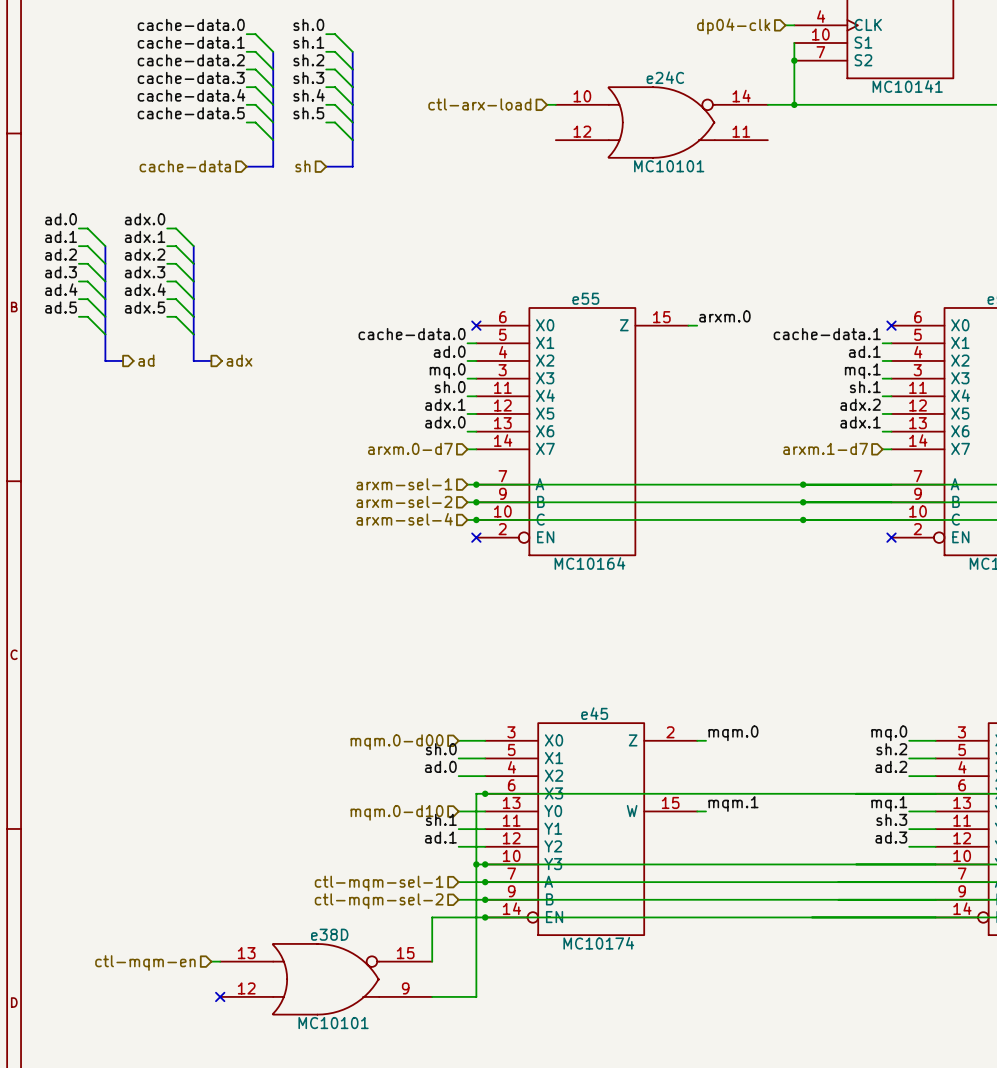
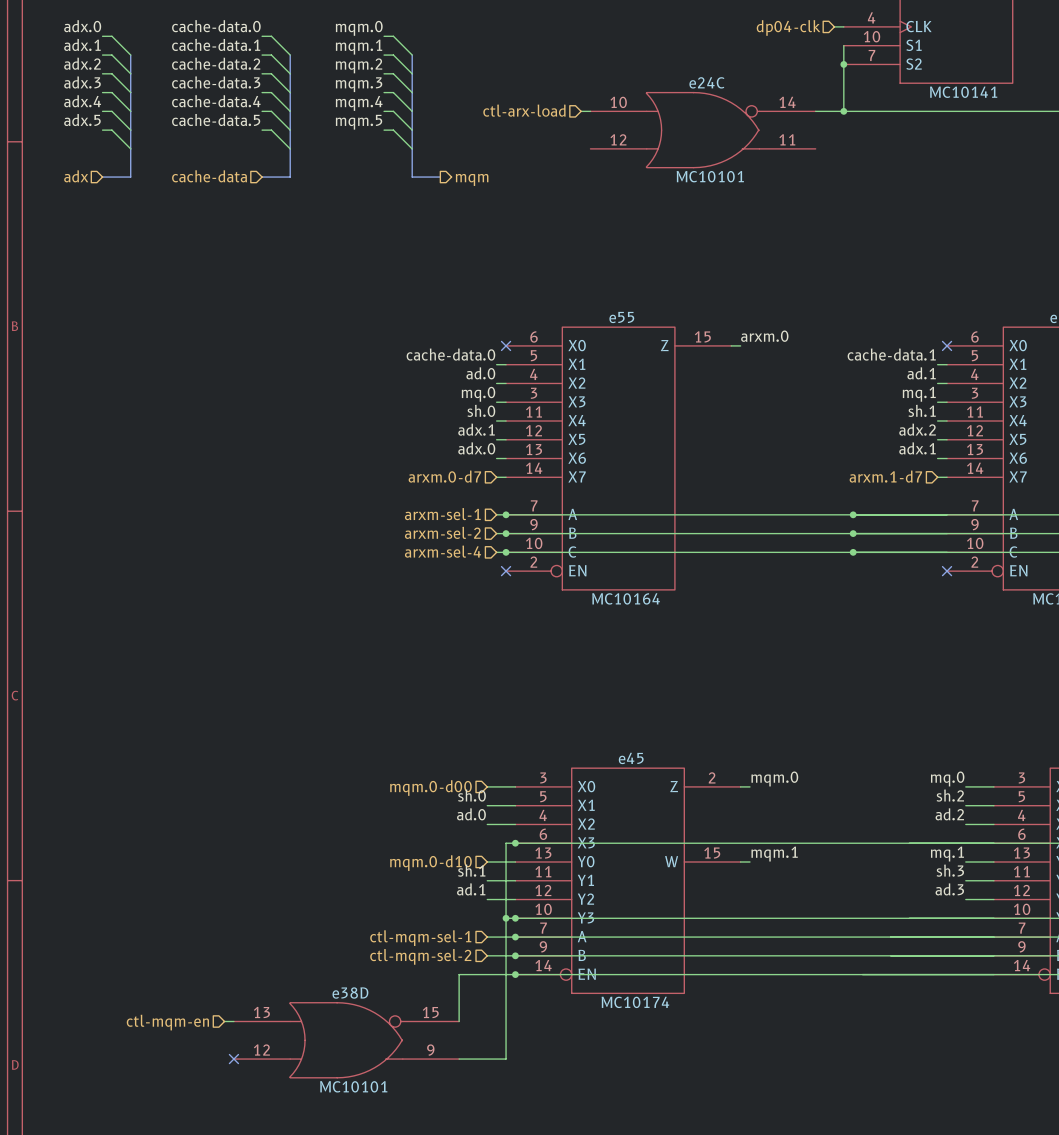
label: none -> adx.0 (82, 26)
label: sh.0 (308, 24) -> none
label: none -> mqm.0 (359, 28)
wire: none -> (102, 36) (111, 36) (130, 55)
wire: (326, 34) (335, 34) (352, 51) -> (384, 36) (393, 36) (412, 55)
label: none -> adx.1 (82, 44)
label: sh.1 (308, 42) -> none
label: none -> mqm.1 (359, 47)
wire: none -> (102, 55) (111, 55) (130, 73)
bus: none -> (130, 55) (130, 177) (102, 177)
wire: (326, 51) (335, 51) (352, 69) -> (384, 55) (393, 55) (412, 73)
bus: (352, 51) (352, 166) (326, 166) -> none
bus: none -> (412, 55) (412, 177) (440, 177)
label: none -> adx.2 (82, 63)
label: sh.2 (308, 60) -> none
label: none -> mqm.2 (359, 65)
wire: (326, 69) (335, 69) (352, 87) -> (384, 73) (393, 73) (412, 92)
label: none -> adx.3 (82, 82)
label: sh.3 (308, 77) -> none
label: none -> mqm.3 (359, 84)
wire: (326, 87) (335, 87) (352, 104) -> (384, 92) (393, 92) (412, 111)
label: none -> adx.4 (82, 101)
label: sh.4 (309, 95) -> none
label: none -> mqm.4 (359, 103)
wire: (326, 104) (335, 104) (352, 122) -> (384, 111) (393, 111) (412, 130)
label: none -> adx.5 (82, 119)
label: sh.5 (308, 113) -> none
label: none -> mqm.5 (359, 122)
wire: (326, 122) (335, 122) (352, 140) -> (384, 130) (393, 130) (412, 148)
hierarchical label: none -> adx (76, 176)
hierarchical label: sh (302, 166) -> none
hierarchical label: none -> mqm (472, 179)
label: ad.0 (61, 219) -> none
label: adx.0 (145, 219) -> none
wire: (78, 228) (87, 228) (105, 246) -> (102, 73) (111, 73) (130, 92)
wire: (167, 228) (176, 228) (193, 246) -> none
label: ad.1 (61, 236) -> none
label: adx.1 (145, 236) -> none
wire: (78, 246) (87, 246) (105, 263) -> (102, 92) (111, 92) (130, 111)
bus: (105, 246) (105, 360) (123, 360) -> none
wire: (167, 246) (176, 246) (193, 263) -> none
bus: (193, 246) (193, 360) (211, 360) -> none
label: ad.2 (61, 254) -> none
label: adx.2 (145, 254) -> none
wire: (78, 263) (87, 263) (105, 281) -> (102, 111) (111, 111) (130, 130)
wire: (167, 263) (176, 263) (193, 281) -> none
label: ad.3 (61, 272) -> none
label: adx.3 (145, 272) -> none
wire: (78, 281) (87, 281) (105, 299) -> (102, 130) (111, 130) (130, 148)
wire: (167, 281) (176, 281) (193, 299) -> none
label: ad.4 (61, 289) -> none
label: adx.4 (145, 289) -> none
wire: (78, 299) (87, 299) (105, 316) -> none
wire: (167, 299) (176, 299) (193, 316) -> none
label: ad.5 (61, 307) -> none
label: adx.5 (145, 307) -> none
wire: (78, 316) (87, 316) (105, 334) -> none
wire: (167, 316) (176, 316) (193, 334) -> none
hierarchical label: ad (146, 360) -> none
hierarchical label: adx (239, 360) -> none

